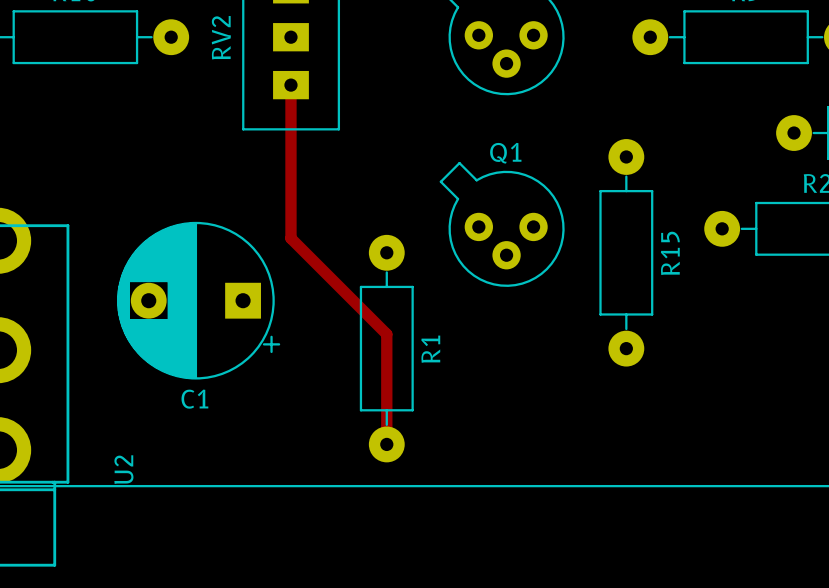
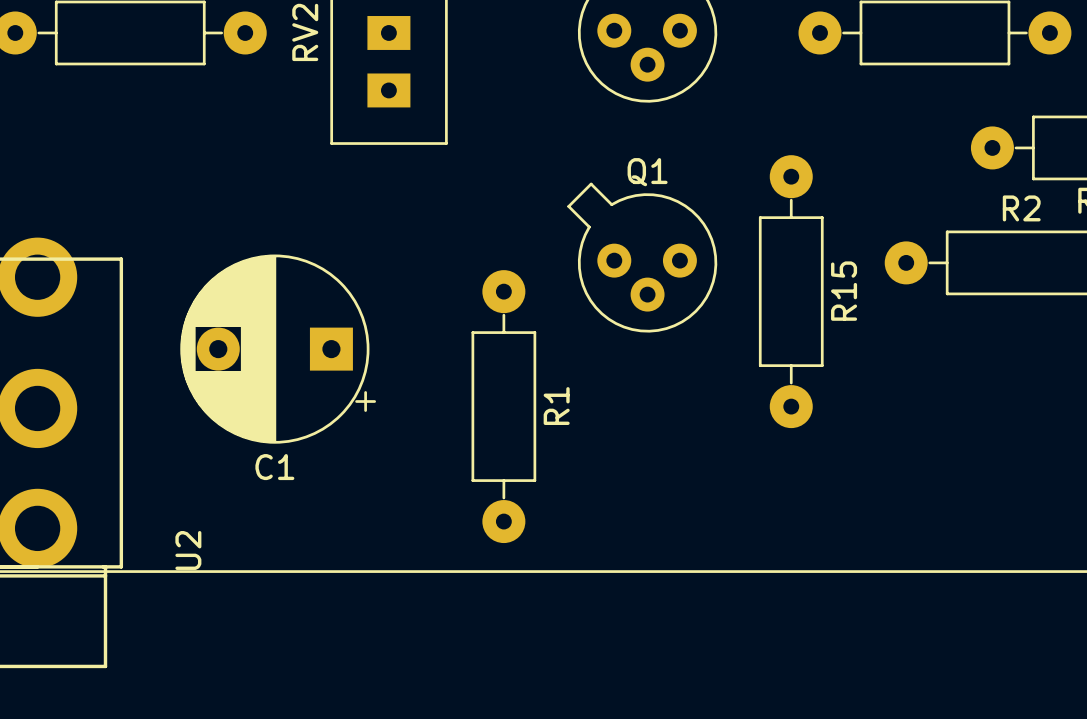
track: (290, 85) (290, 238) (386, 334) (386, 444) -> none

